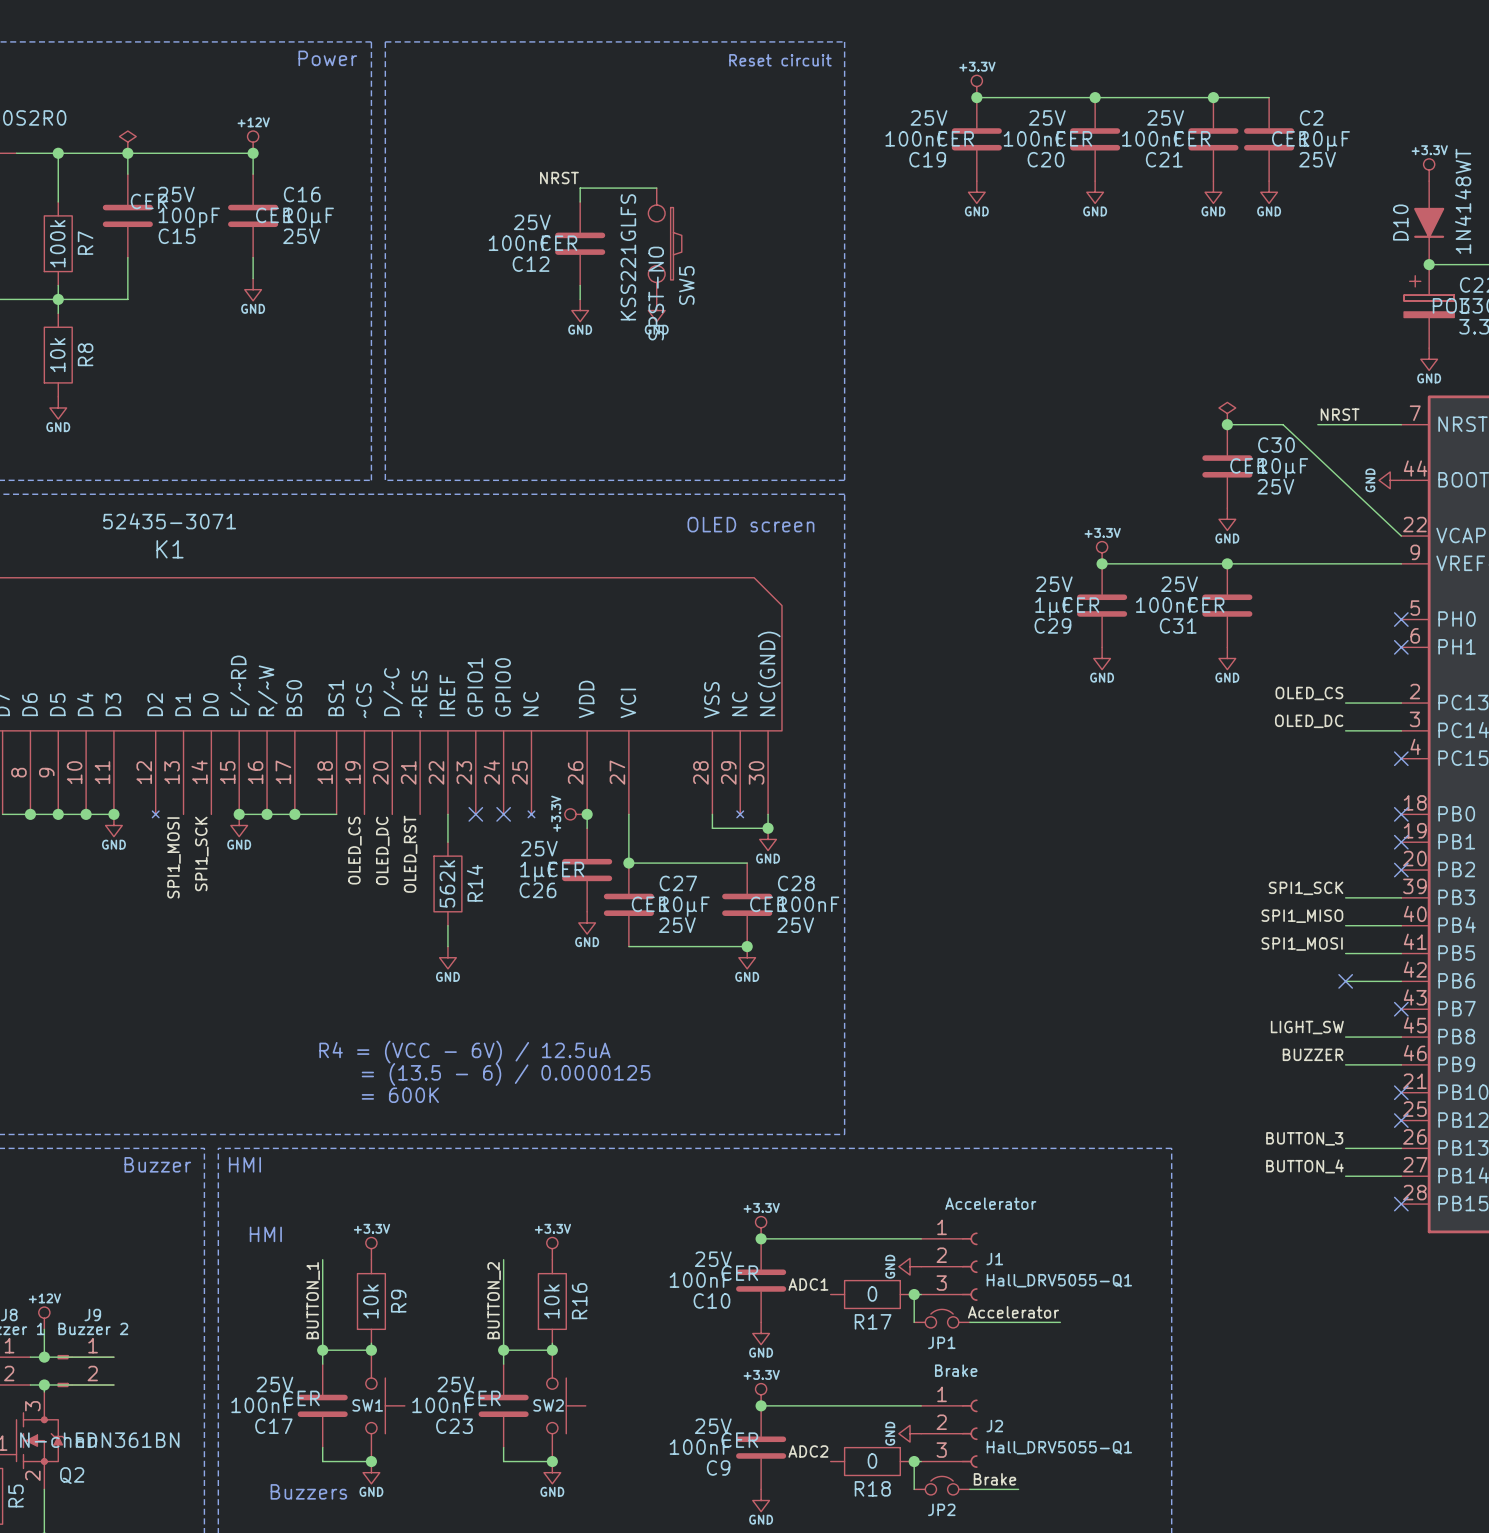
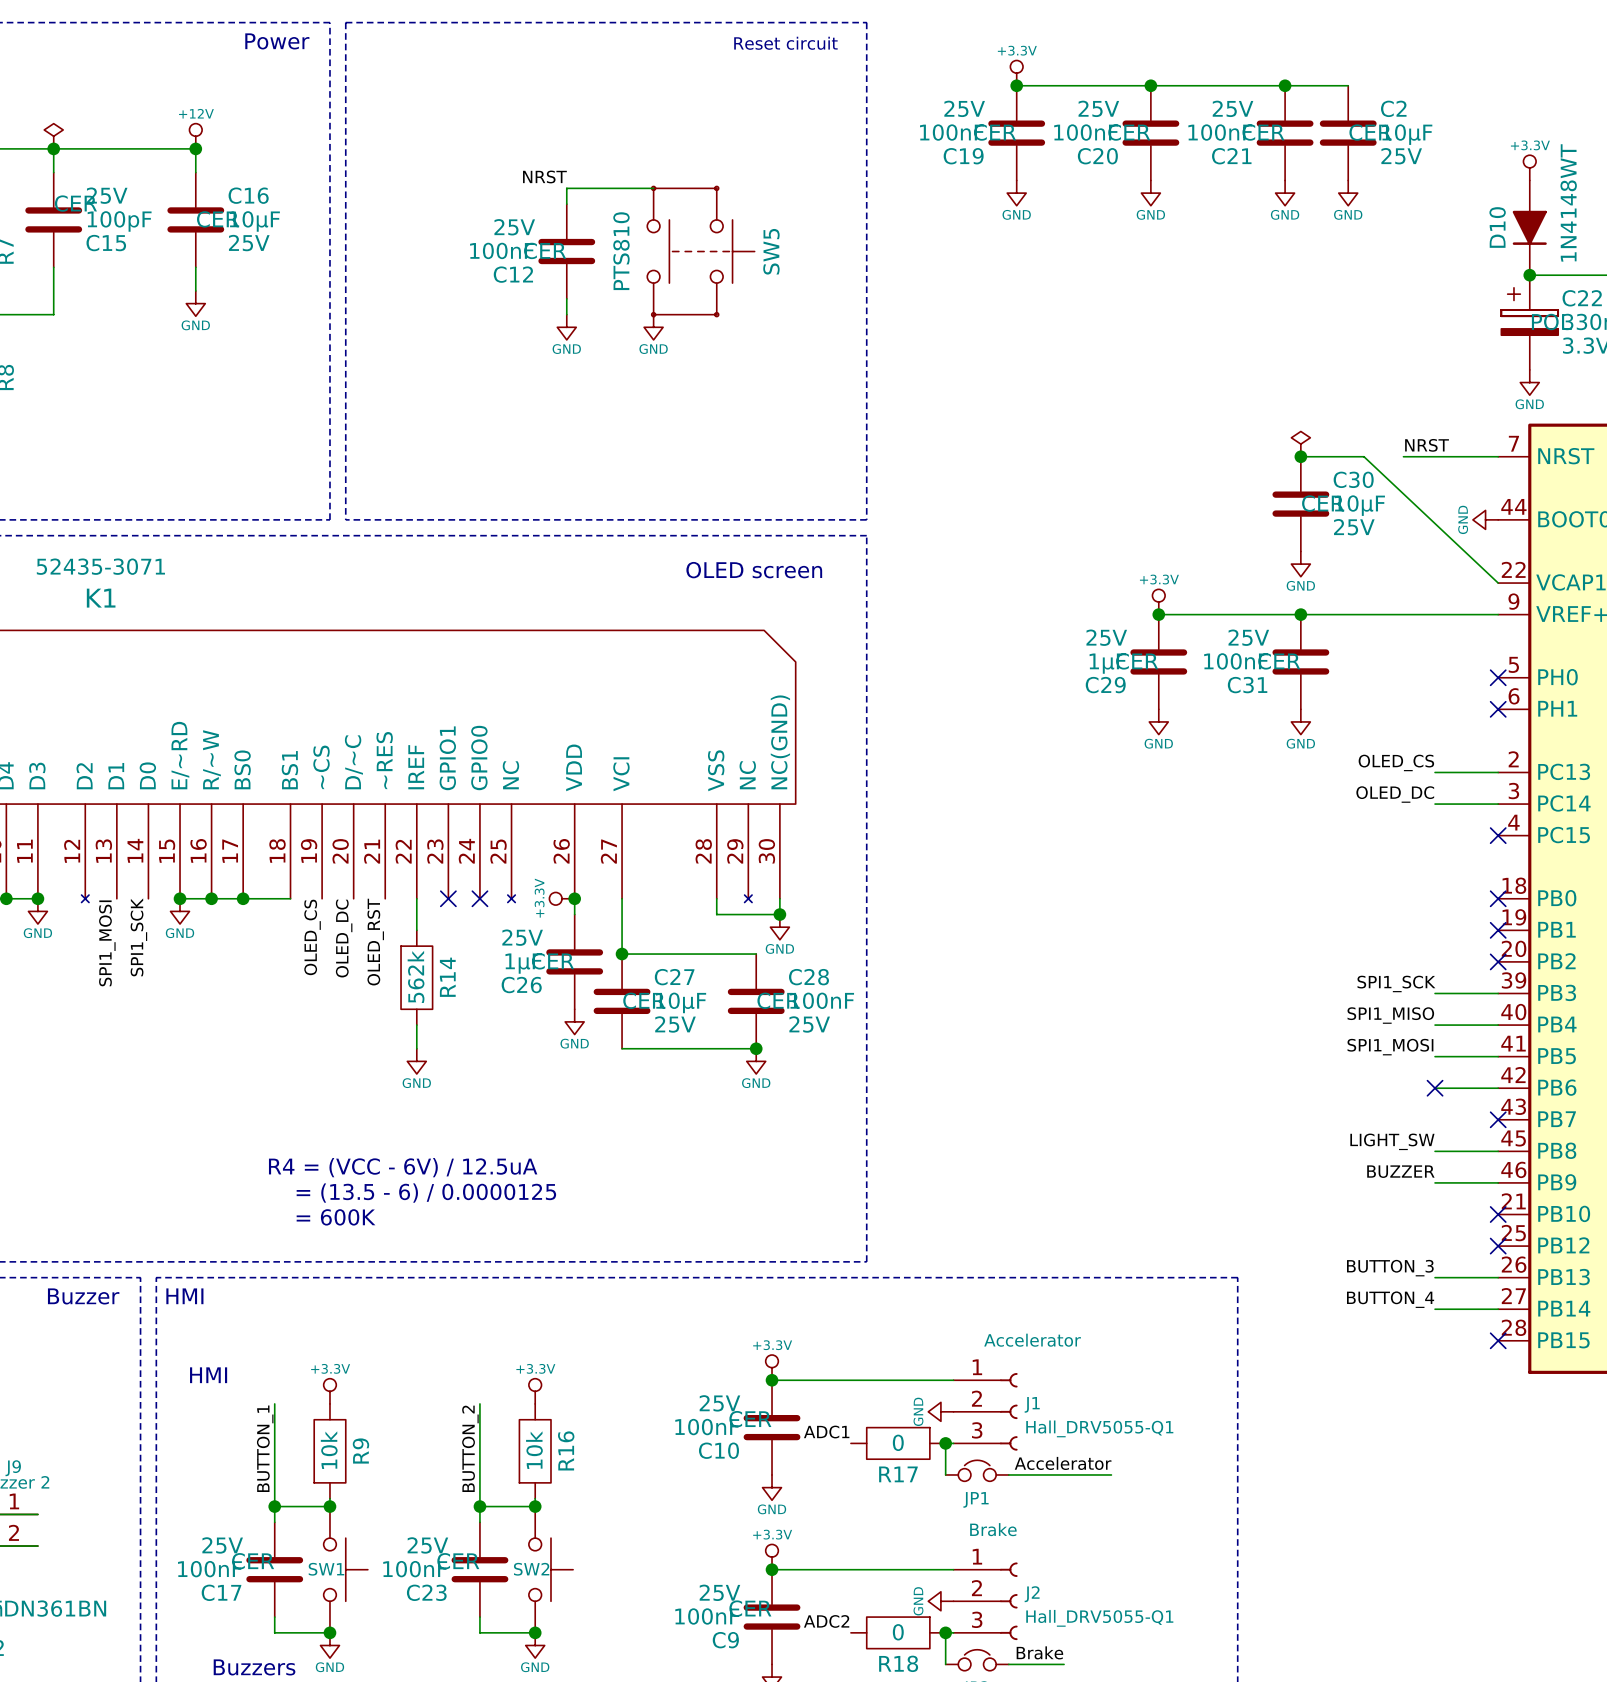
SW5 symbol: [648, 188, 682, 300] -> [647, 186, 755, 317]
SW5 text: none -> PTS810 (621, 251)
SW5 text: KSS221GLFS (628, 257) -> none
SW5 name position: SW5 (686, 285) -> SW5 (771, 251)
SW5 text: SPST-NO (656, 293) -> none

